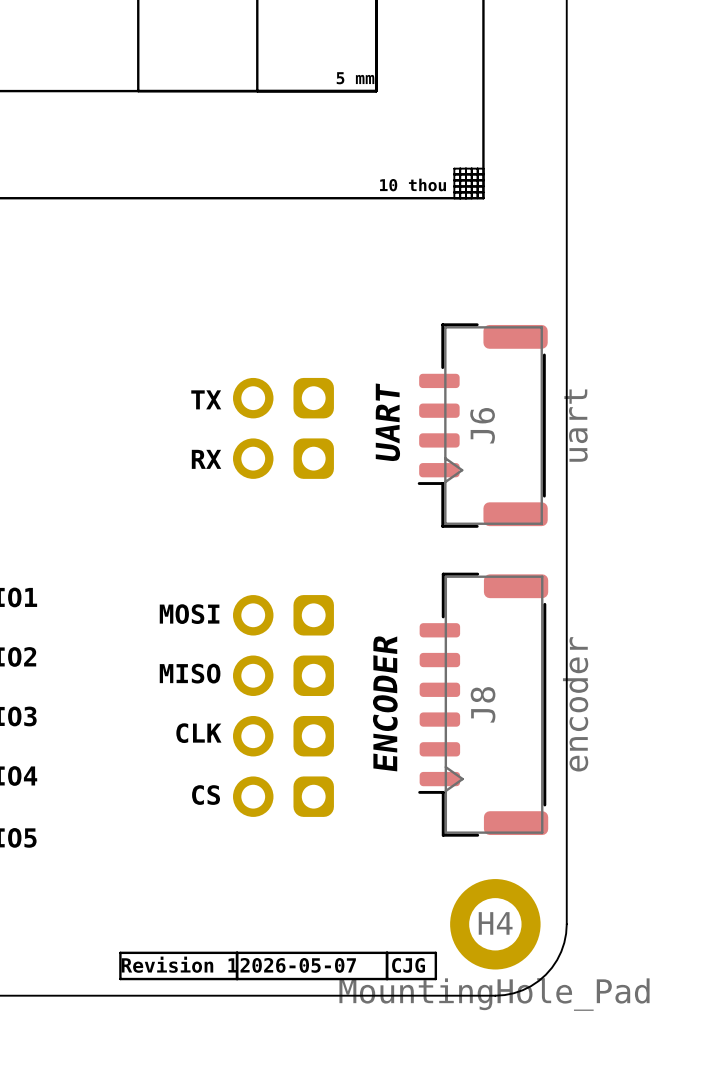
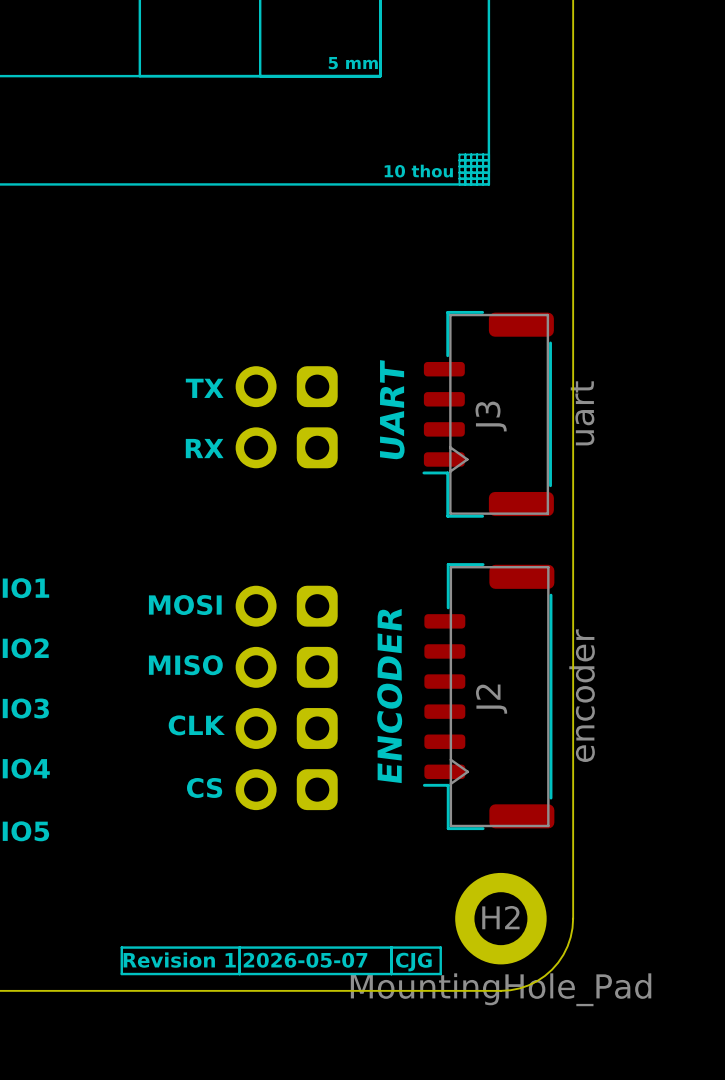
J6 name: J6 (482, 425) -> J3 (491, 416)
J8 name: J8 (483, 704) -> J2 (491, 699)
H4 name: H4 (495, 923) -> H2 (500, 917)

